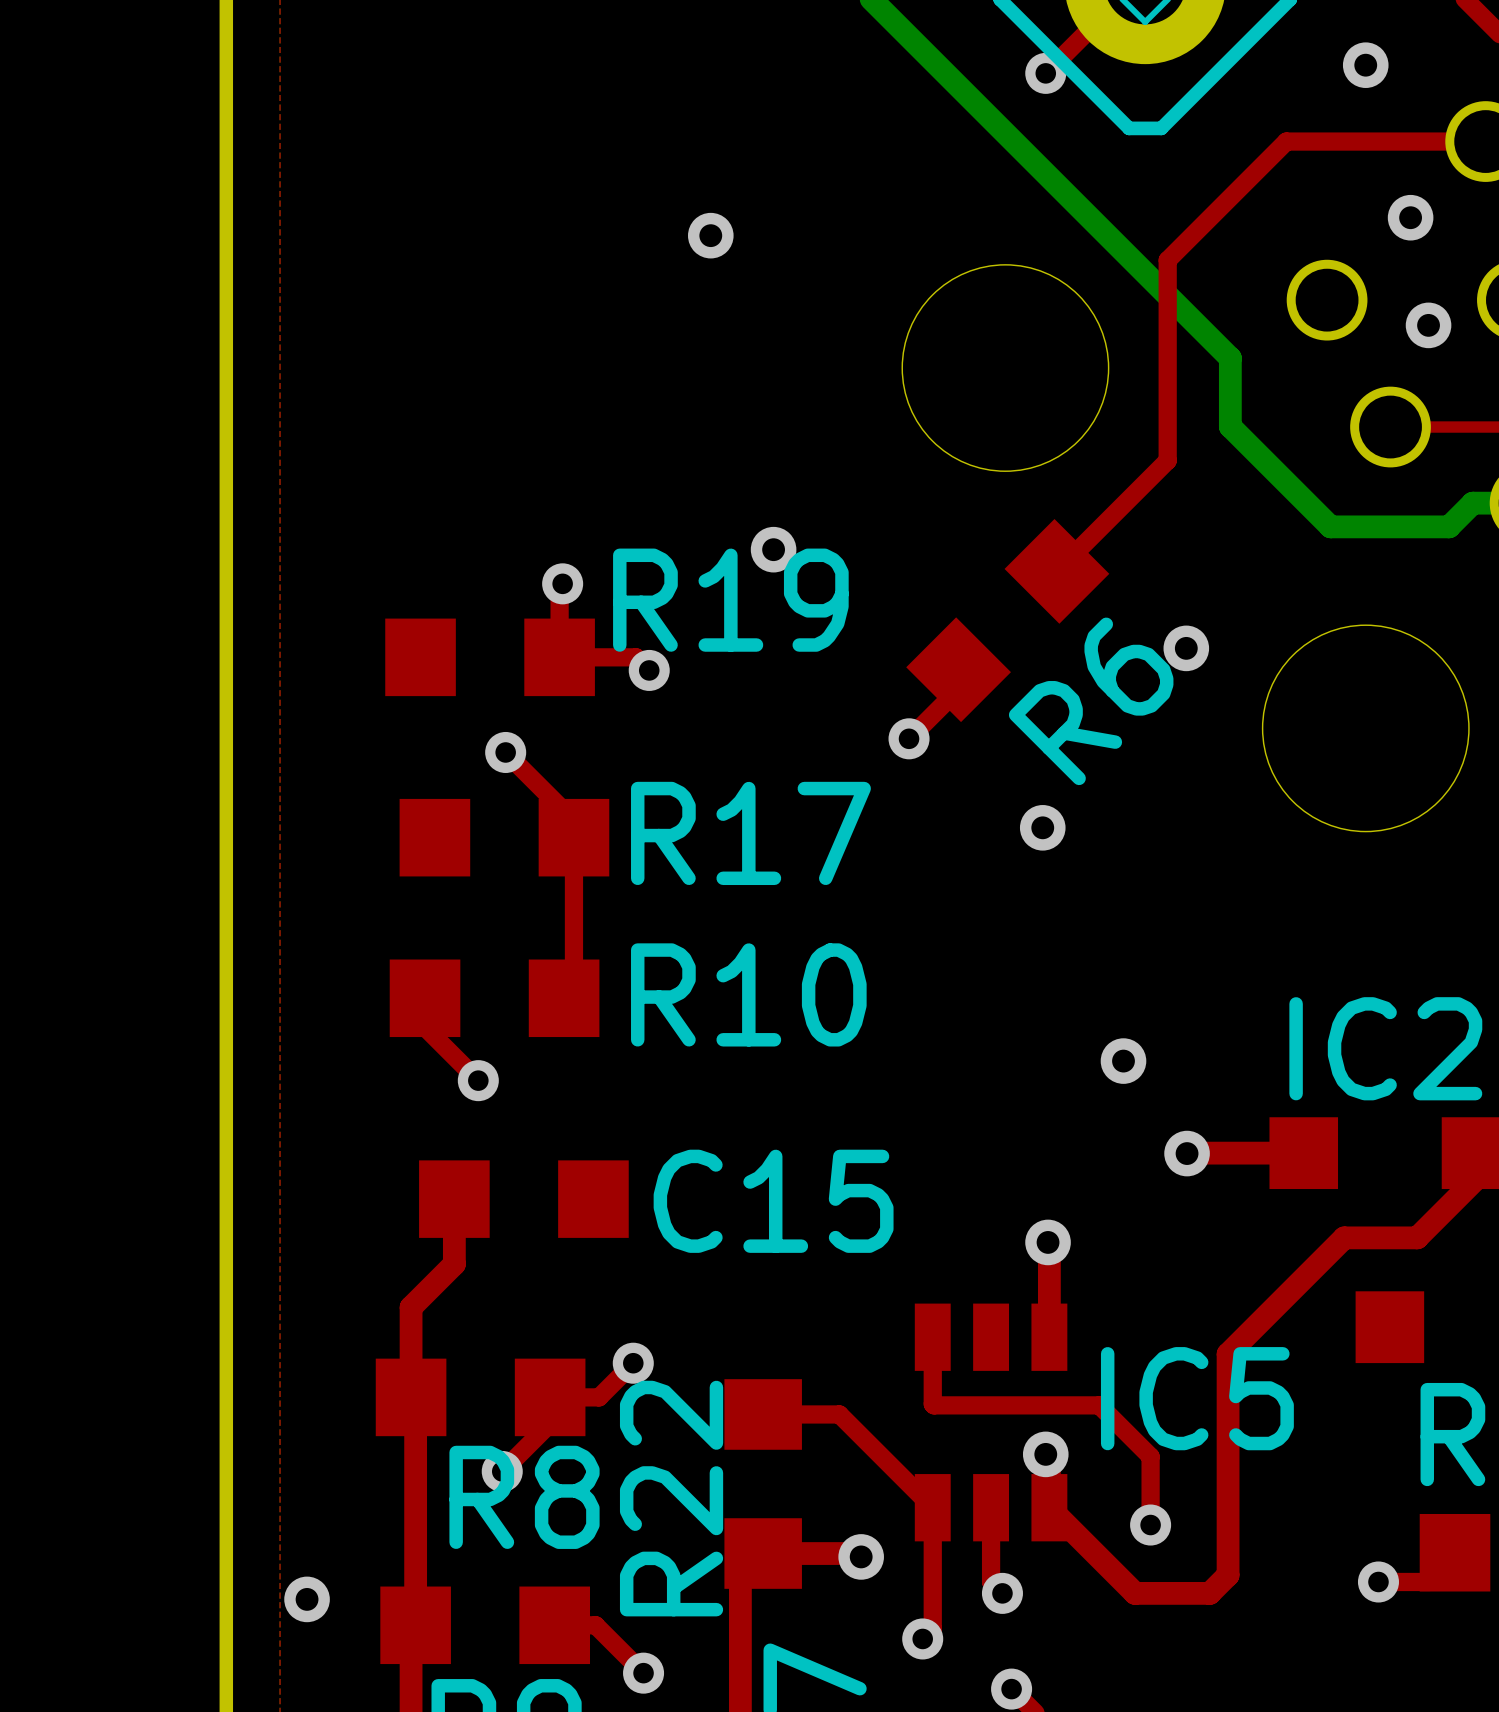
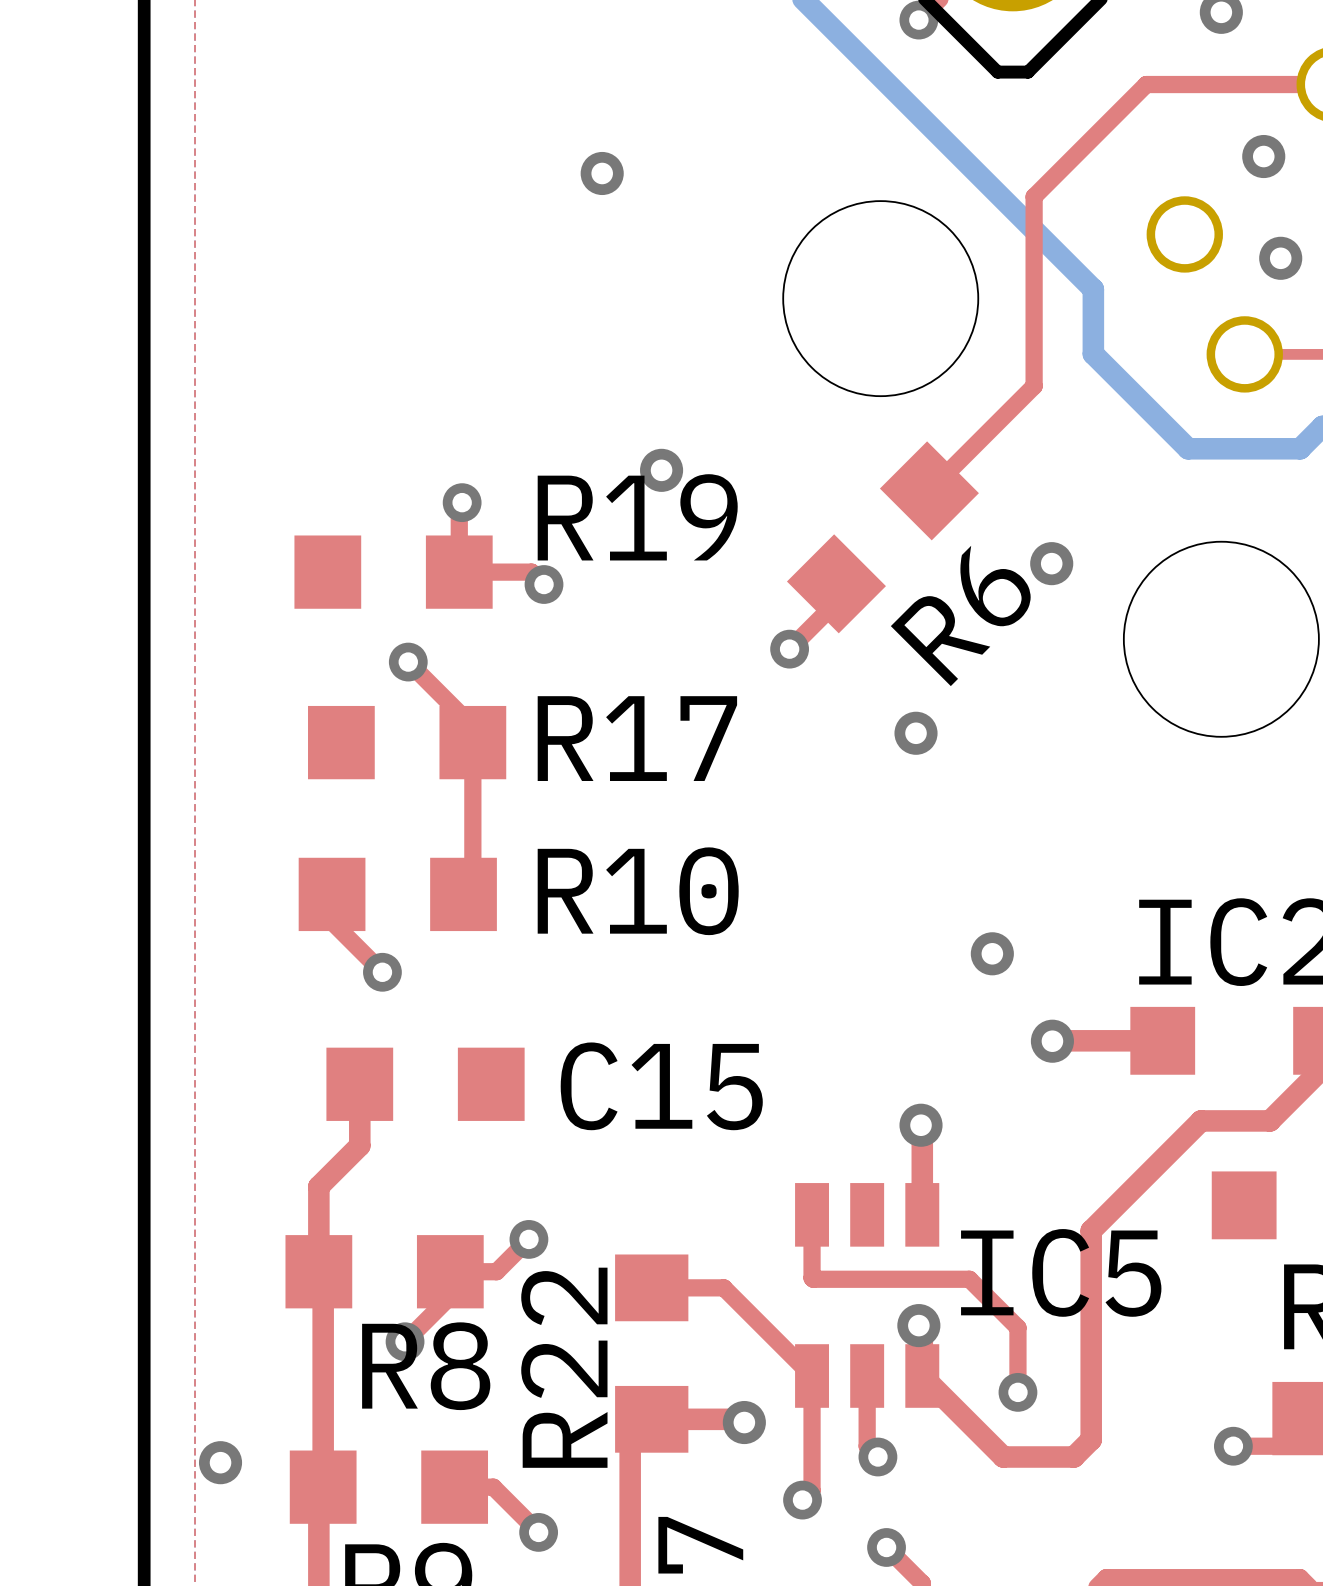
R19 name position: R19 (730, 600) -> R19 (637, 517)

